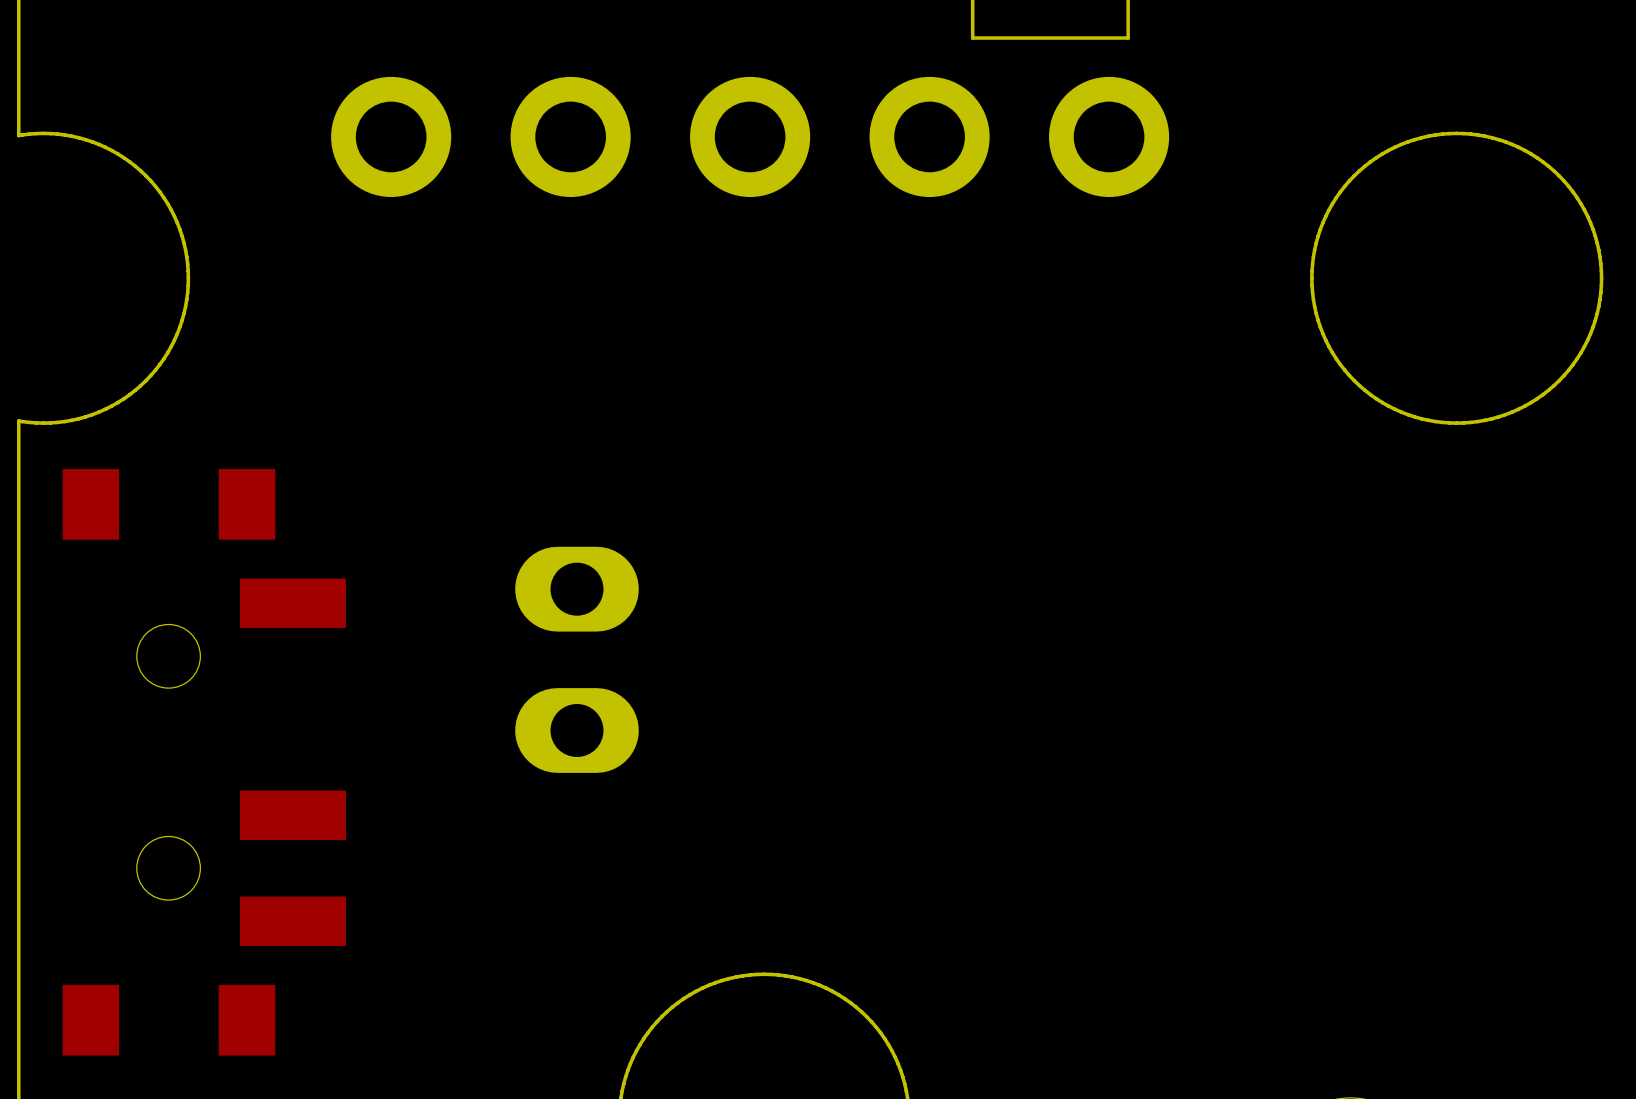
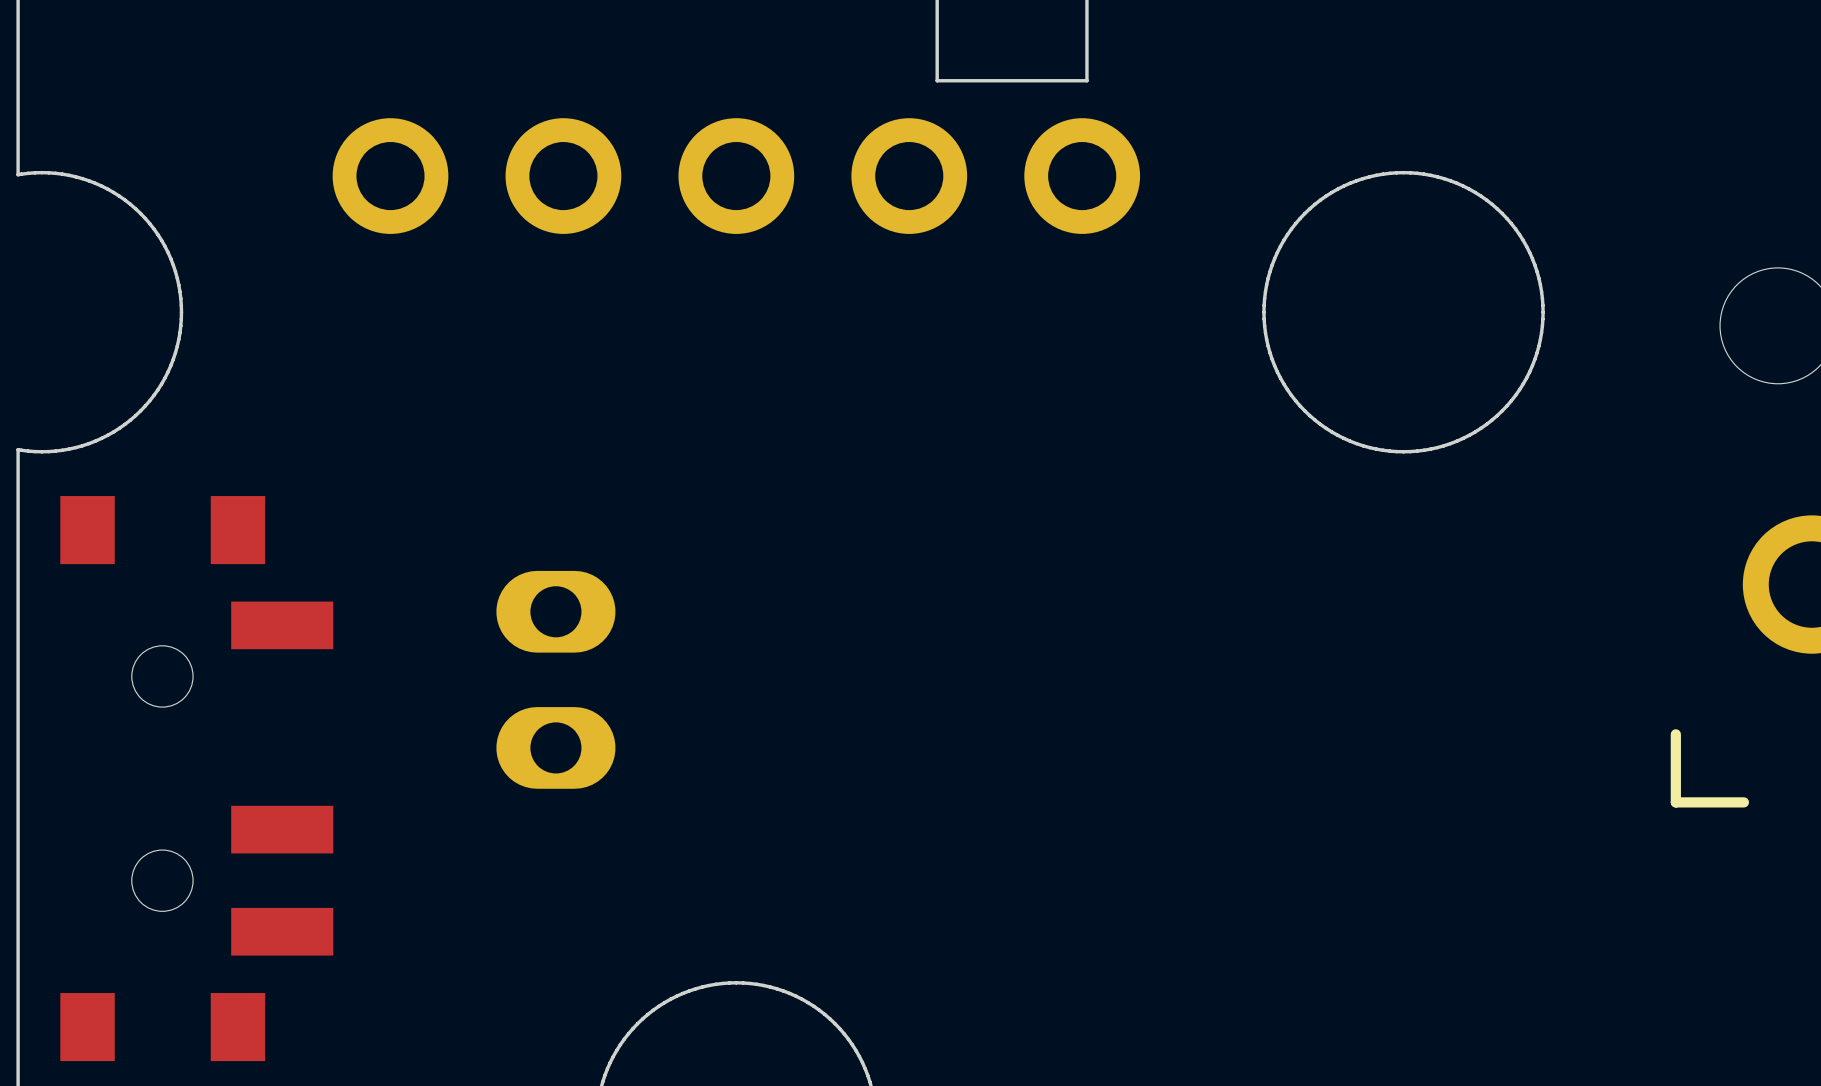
part position: (750, 136) -> (736, 176)

